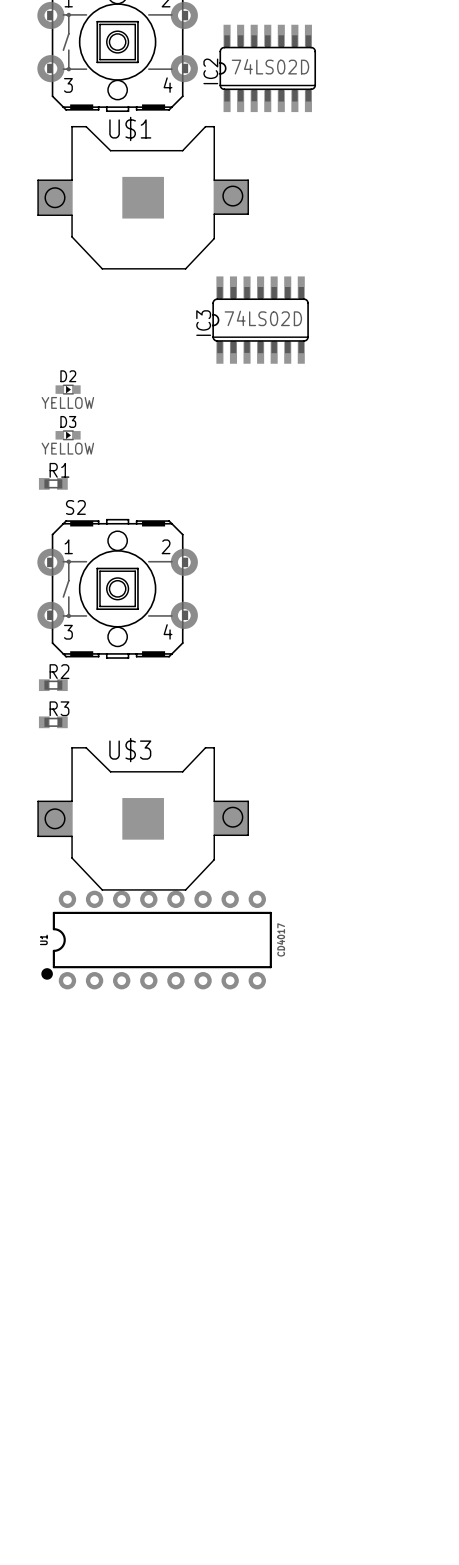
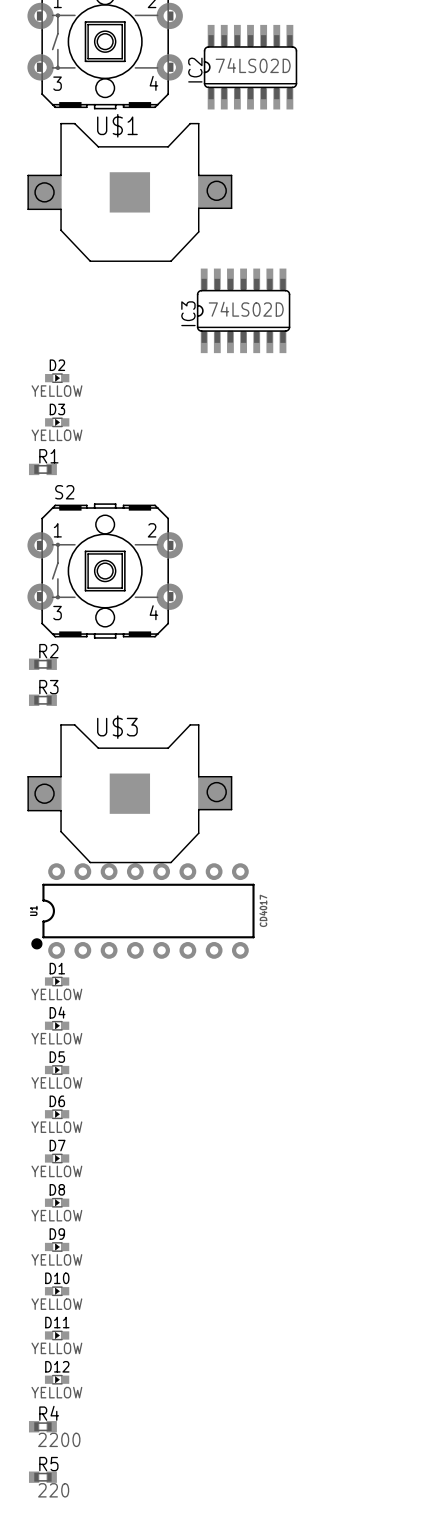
D1: none -> YELLOW (57, 981)
D4: none -> YELLOW (57, 1025)
D5: none -> YELLOW (57, 1070)
D6: none -> YELLOW (57, 1114)
D7: none -> YELLOW (57, 1158)
D8: none -> YELLOW (57, 1202)
D9: none -> YELLOW (57, 1246)
D10: none -> YELLOW (57, 1291)
D11: none -> YELLOW (57, 1335)
D12: none -> YELLOW (57, 1379)
R4: none -> 2200 (42, 1426)
R5: none -> 220 (42, 1477)

